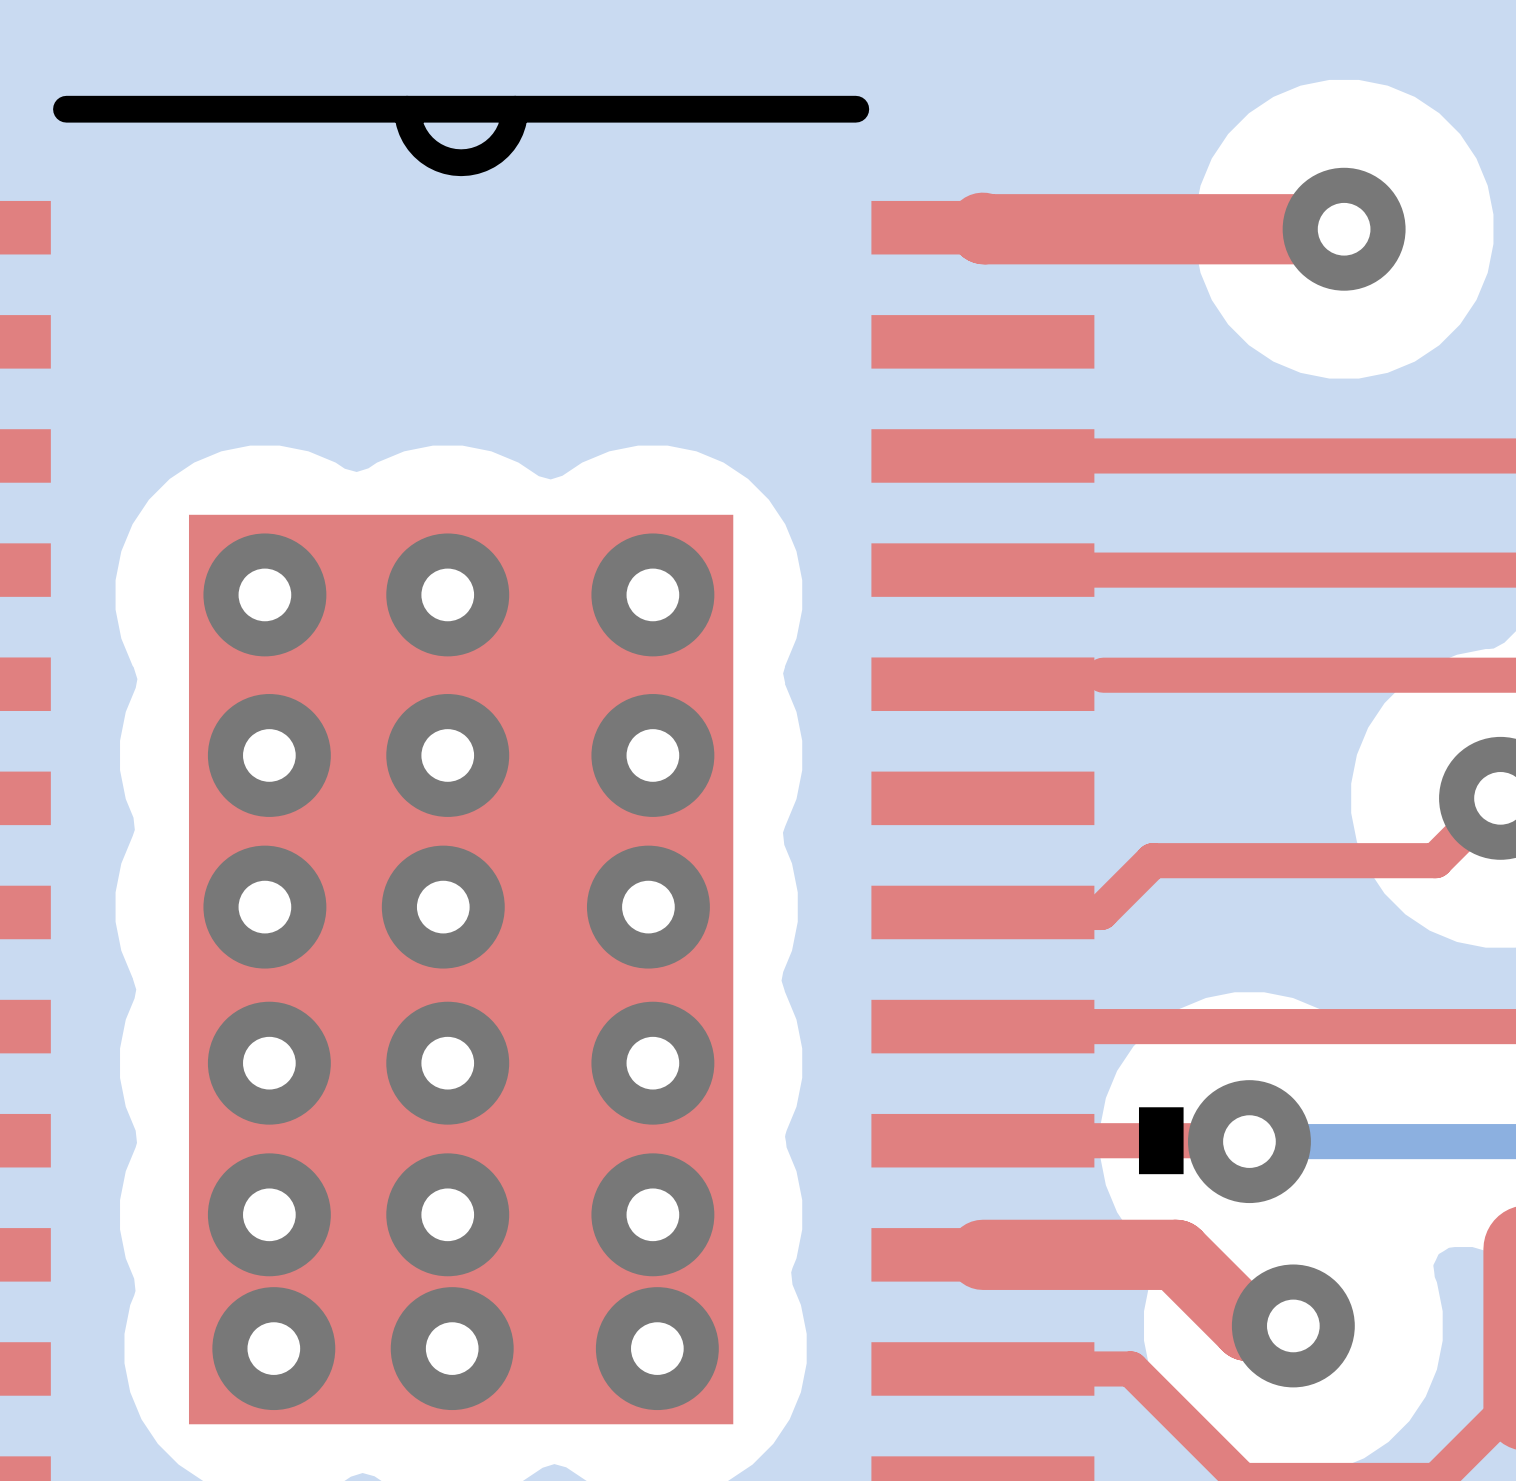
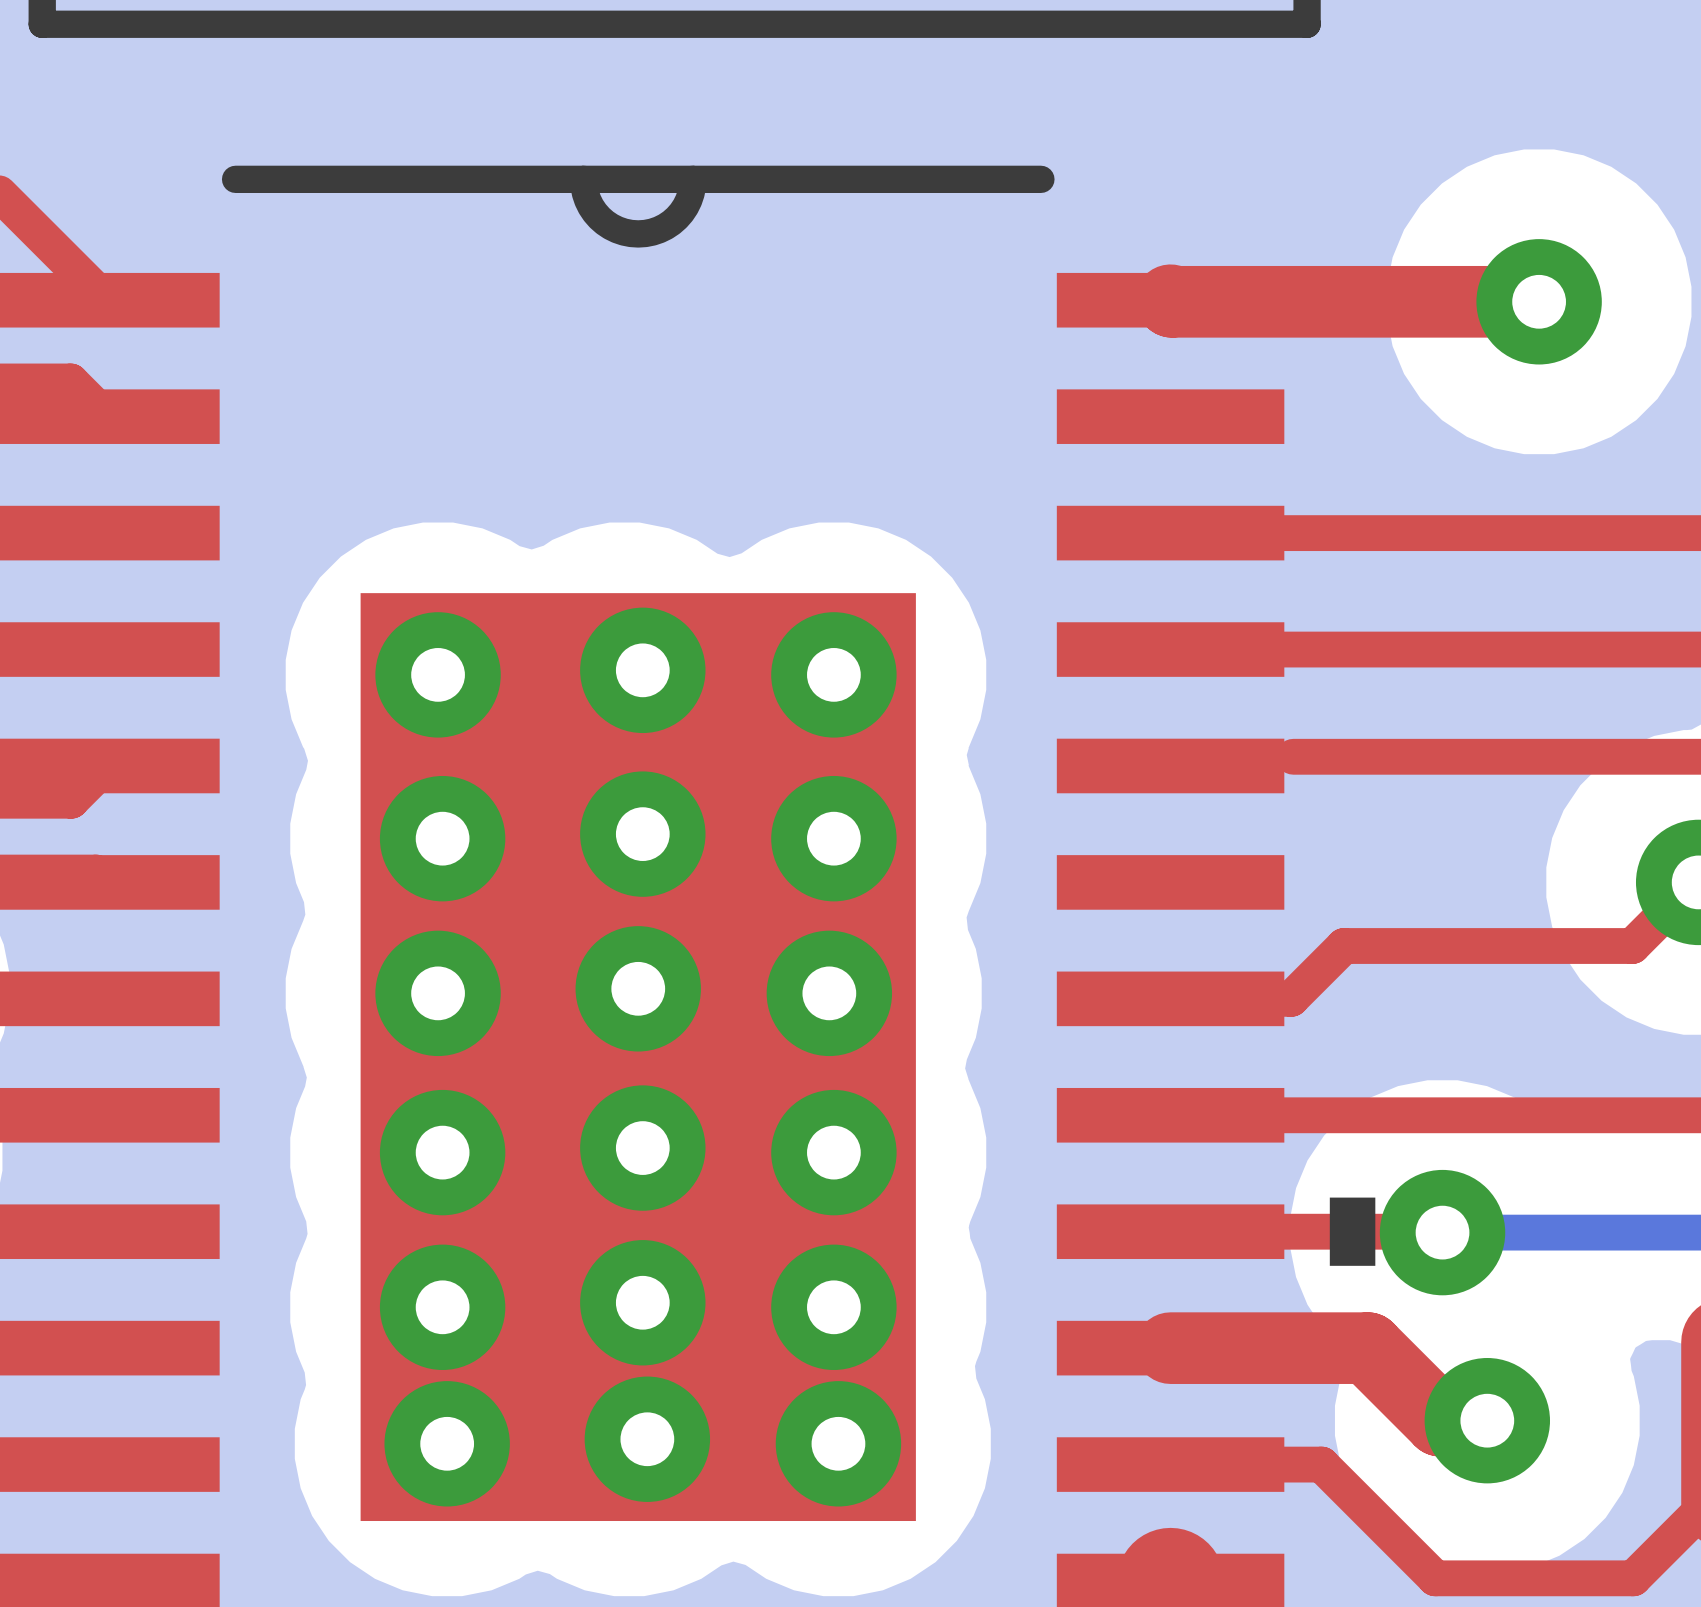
via position: (447, 594) -> (642, 670)
via position: (447, 755) -> (642, 834)
via position: (443, 907) -> (638, 988)
via position: (447, 1063) -> (642, 1148)
via position: (447, 1214) -> (642, 1302)
via position: (452, 1348) -> (647, 1439)

